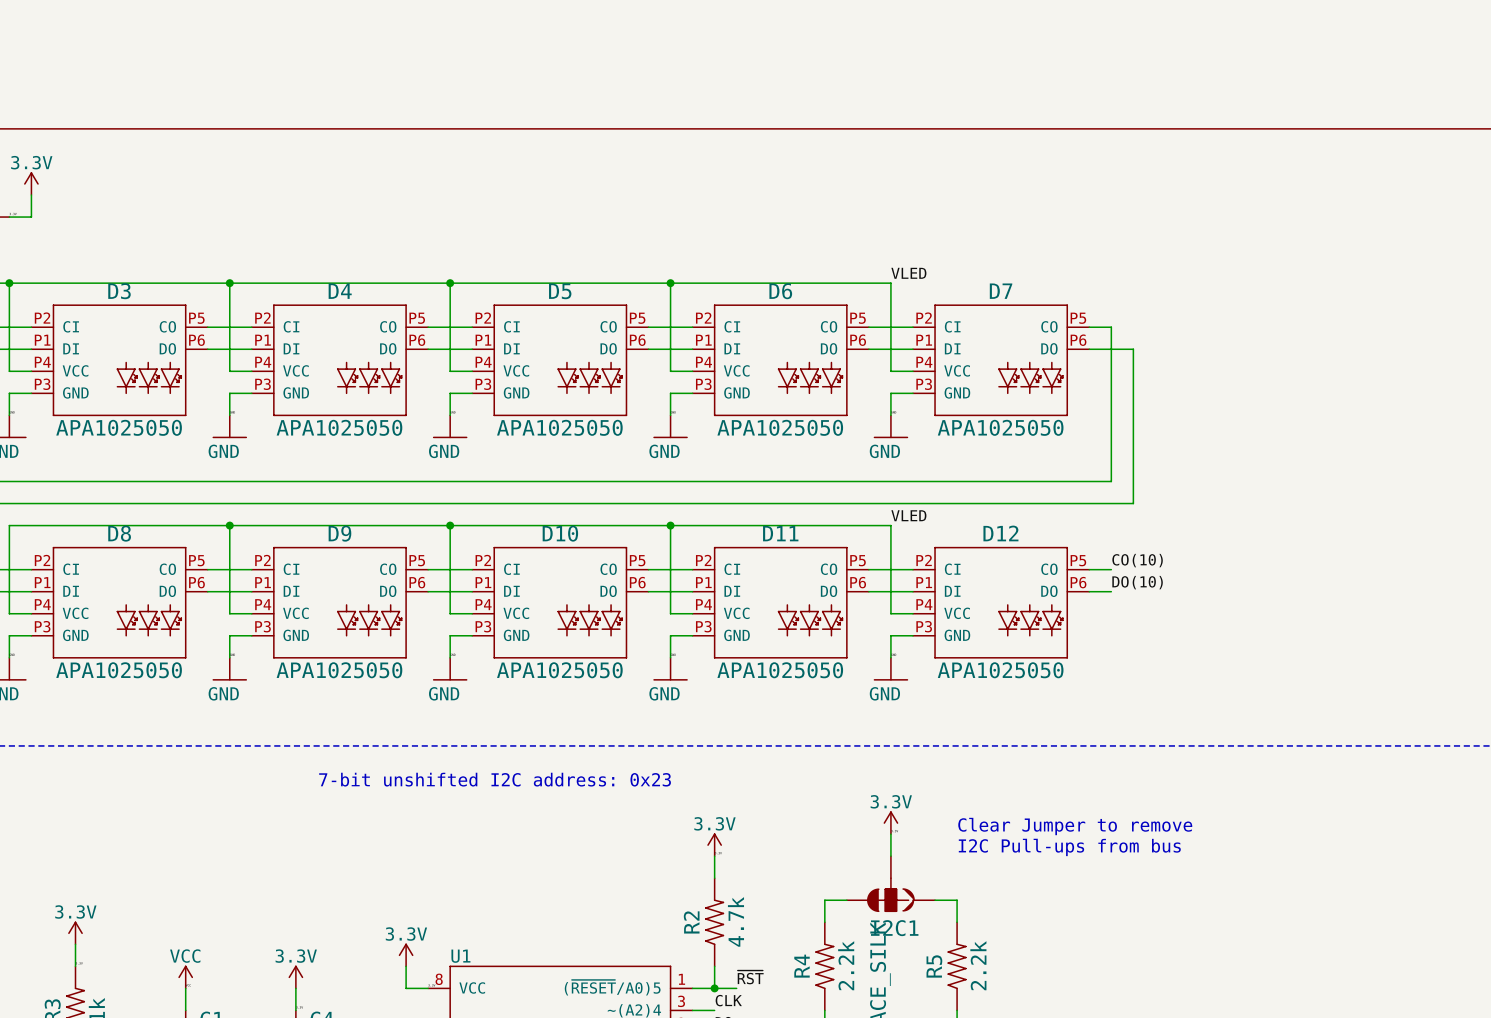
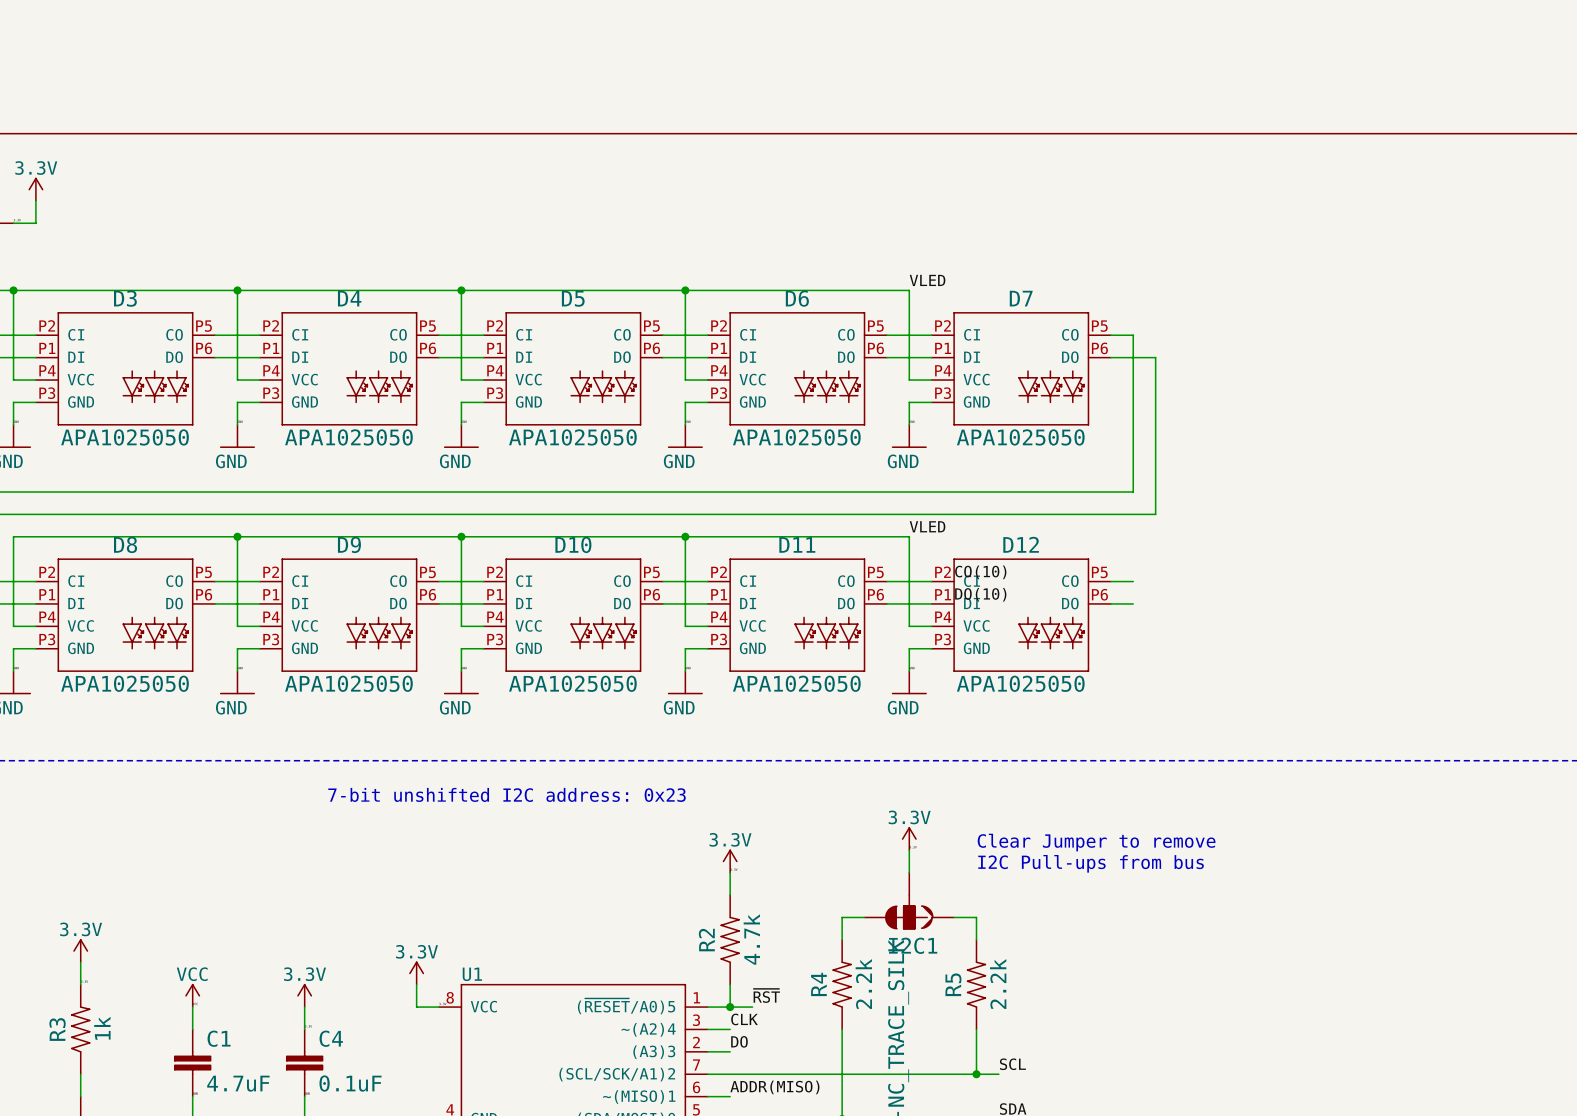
label position: CO(10) (1137, 560) -> CO(10) (980, 572)
label position: DO(10) (1137, 582) -> DO(10) (980, 594)

